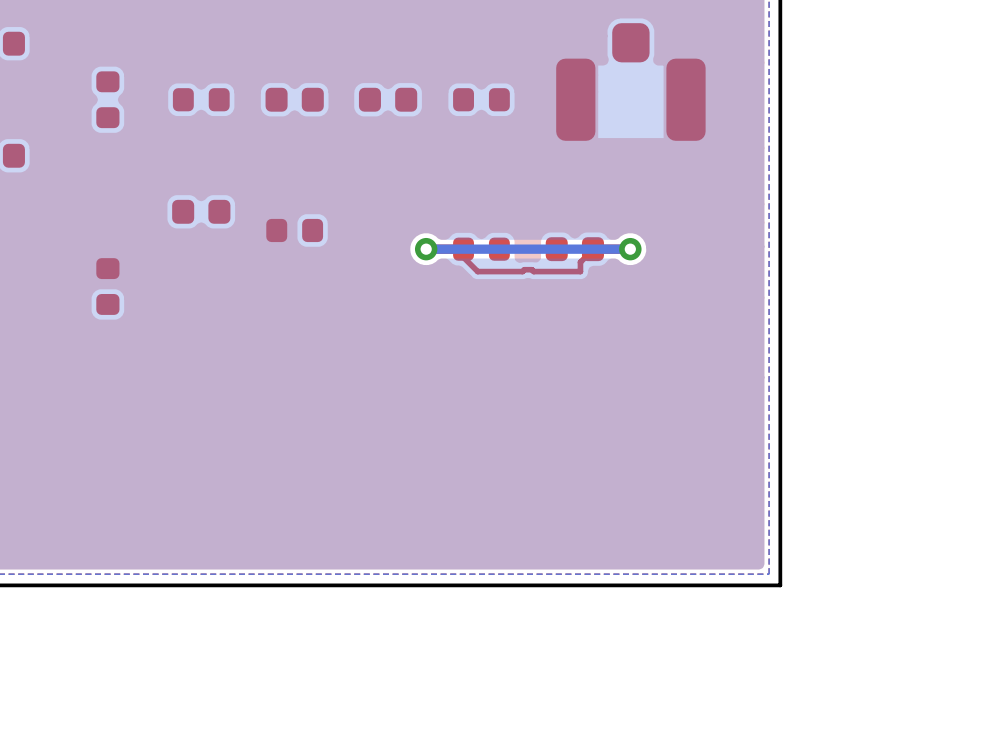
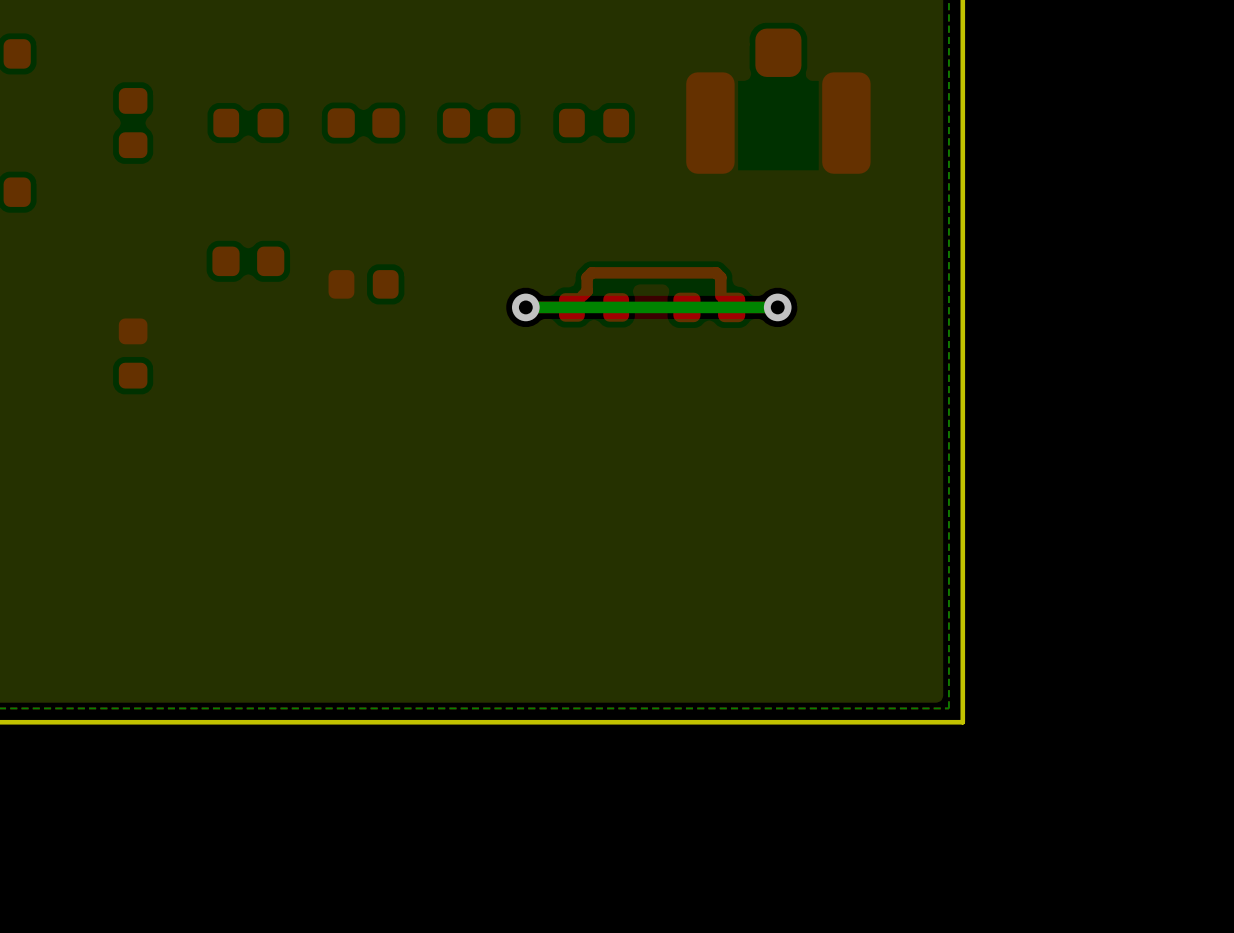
top track: none -> (720, 295) (720, 277) (716, 272) (591, 272) (587, 277) (587, 291) (582, 295)
top track: (589, 252) (580, 262) (580, 271) (533, 271) (531, 269) (522, 271) (477, 271) (462, 256) (462, 252) -> none

